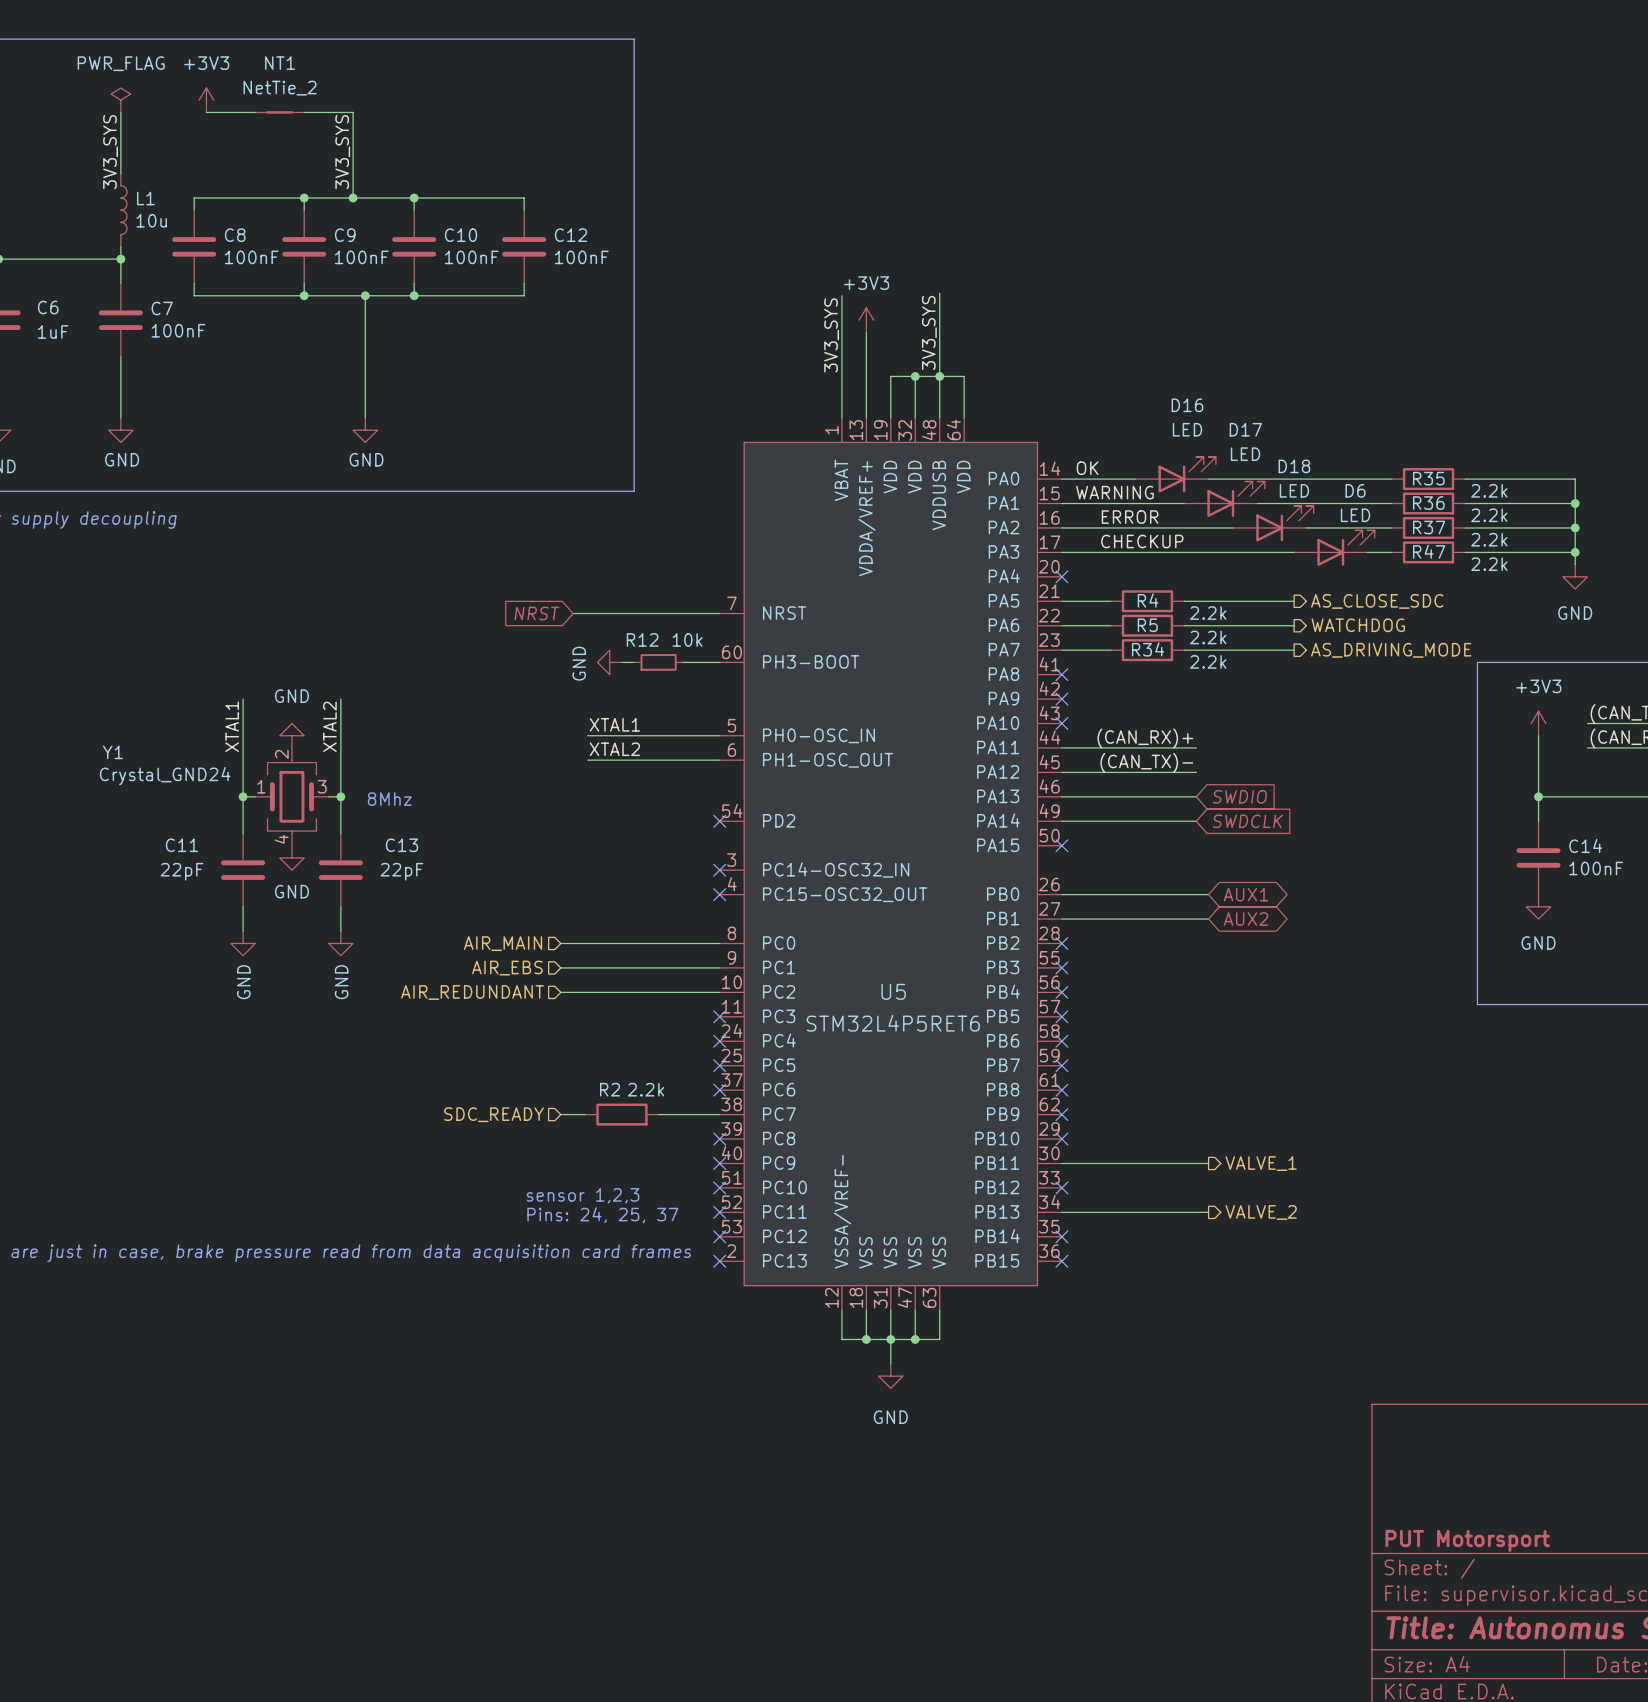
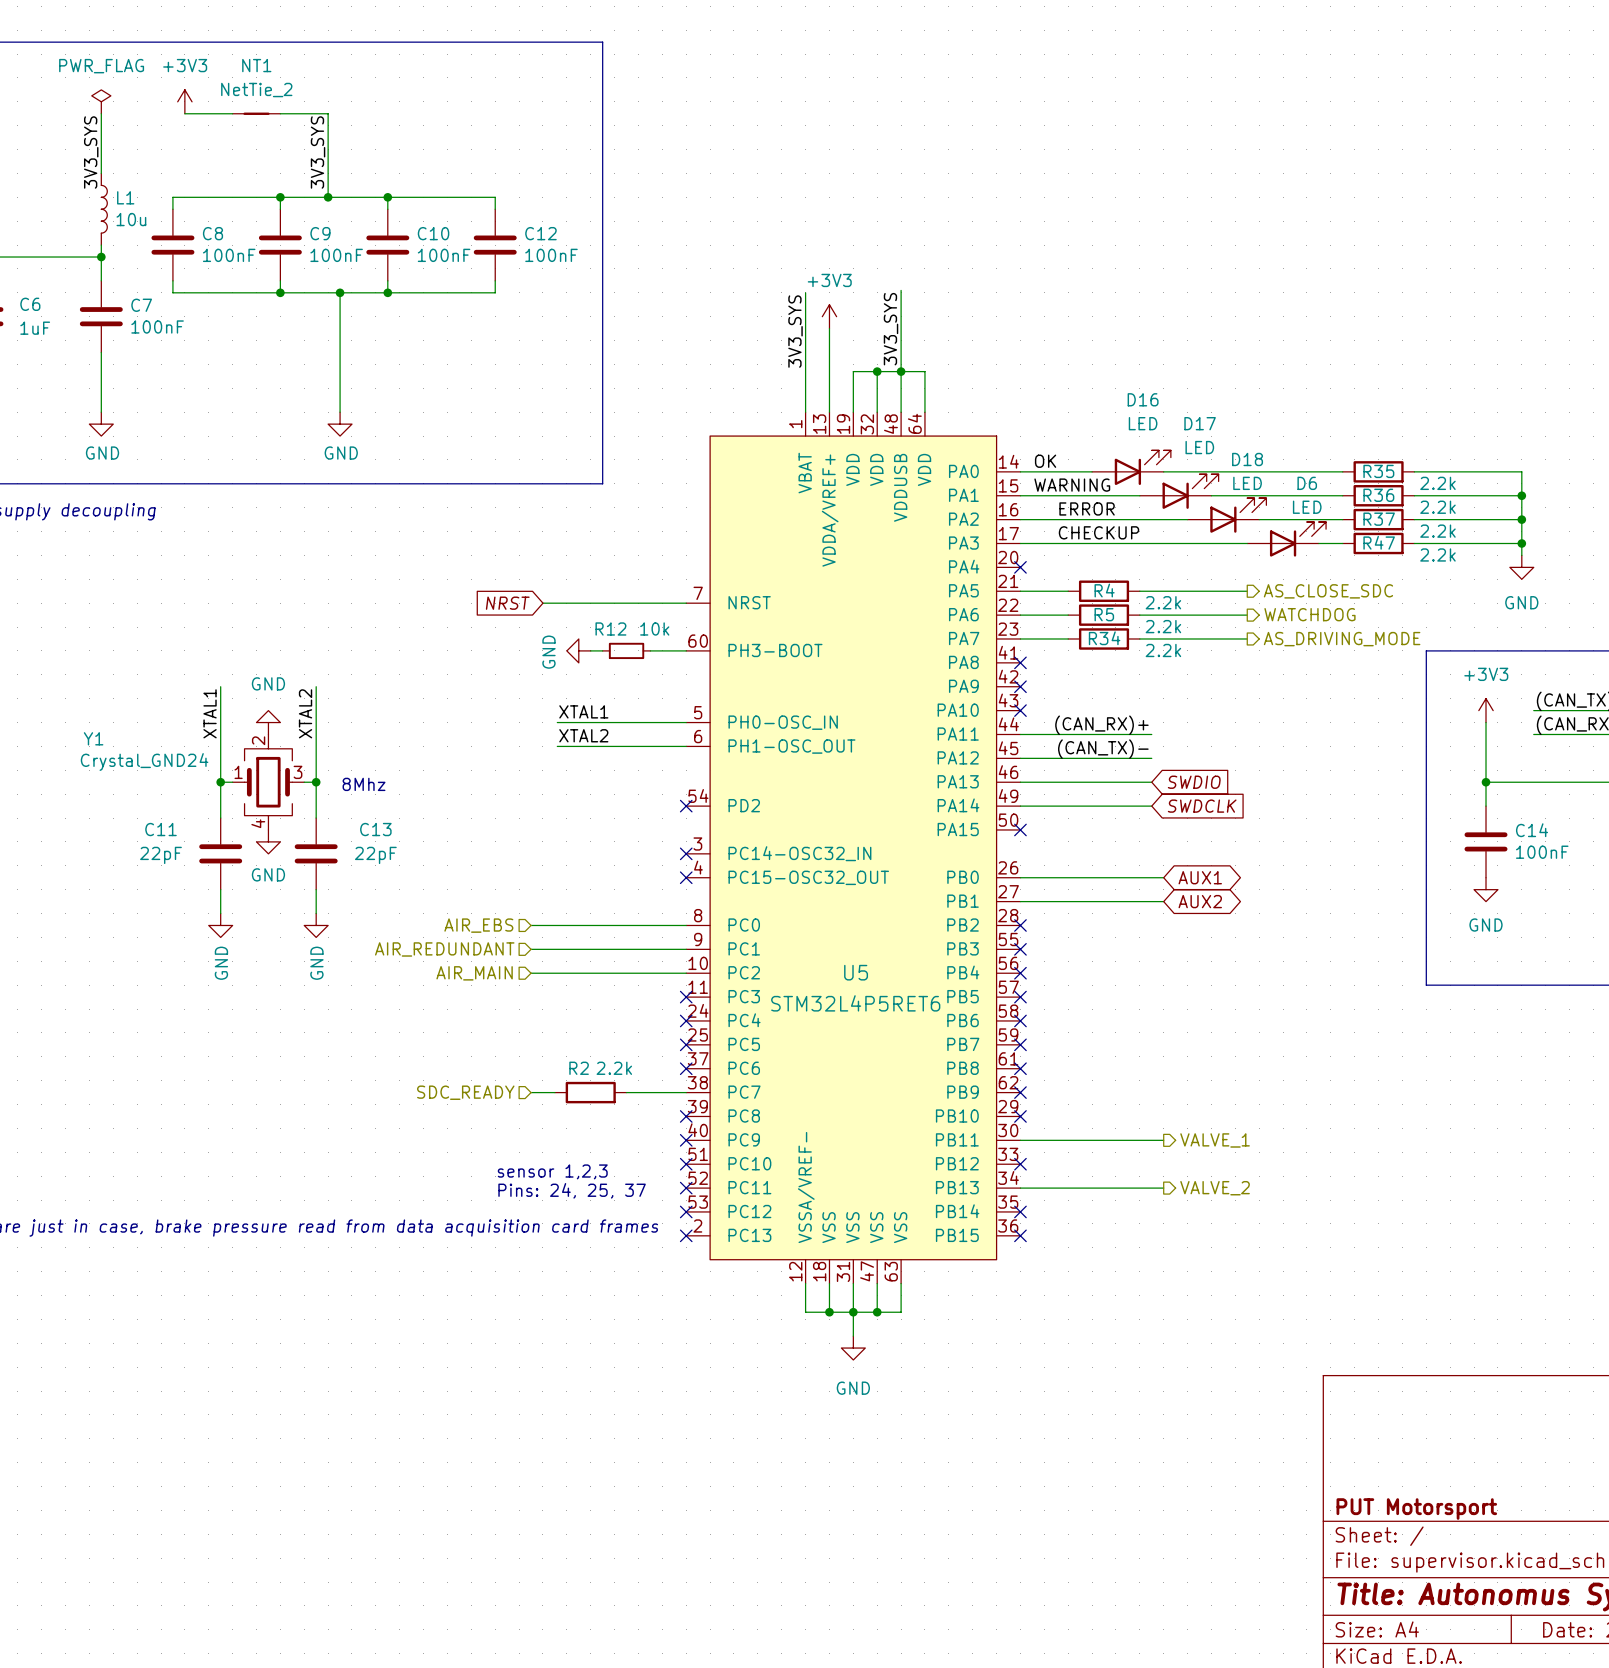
hierarchical label: AIR_MAIN (503, 943) -> AIR_EBS (478, 925)
hierarchical label: AIR_EBS (507, 968) -> AIR_REDUNDANT (444, 949)
hierarchical label: AIR_REDUNDANT (472, 992) -> AIR_MAIN (474, 973)

